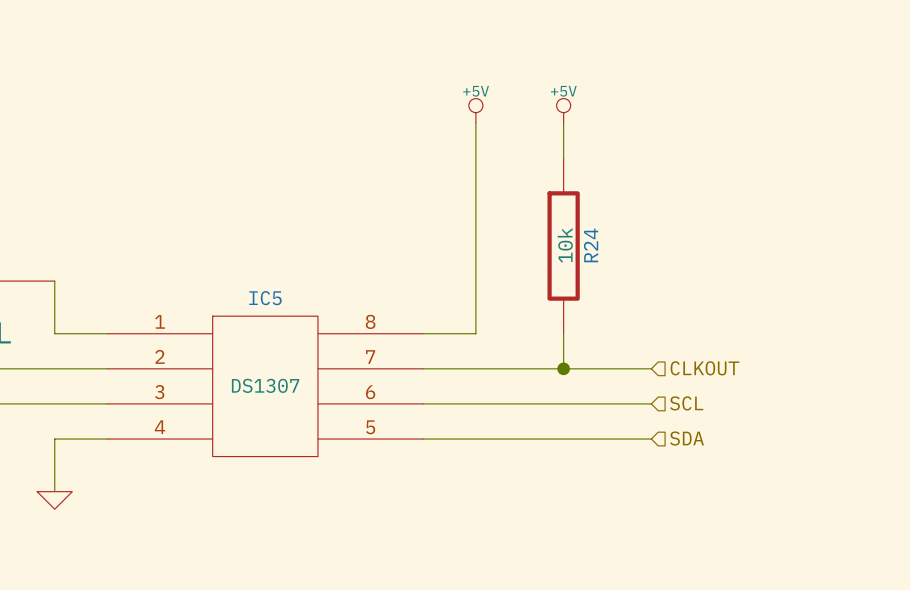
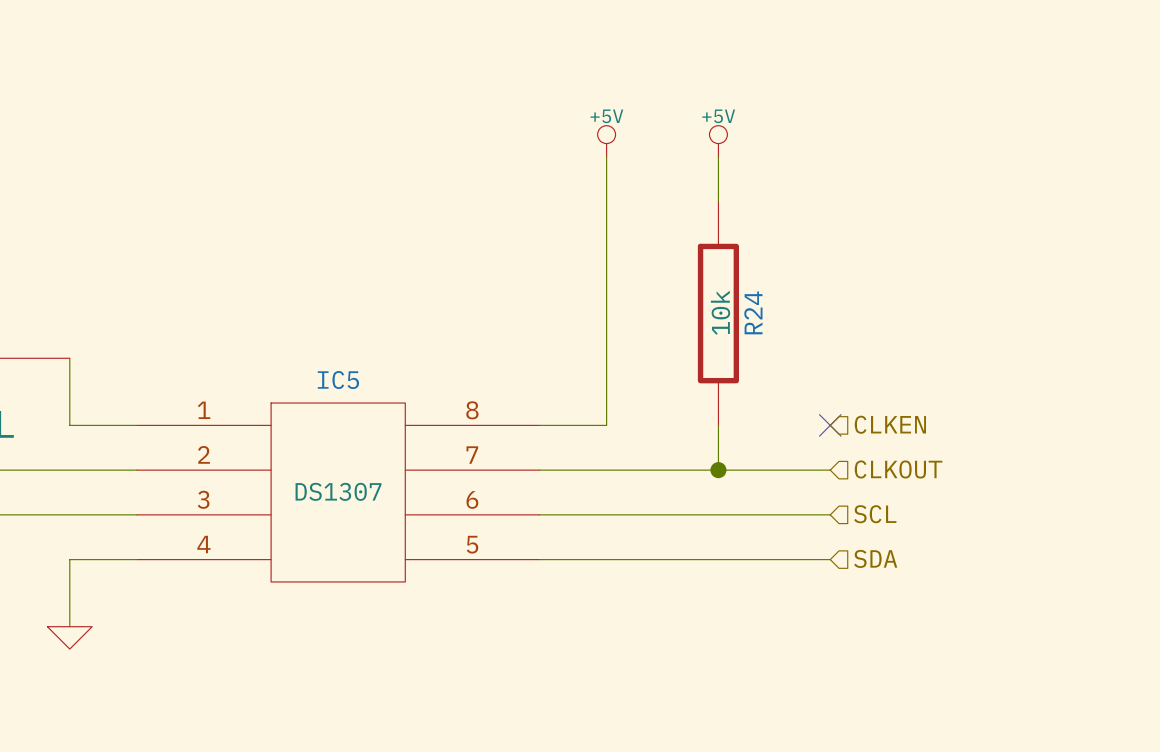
no-connect mark: none -> (830, 425)
hierarchical label: none -> CLKEN (890, 424)

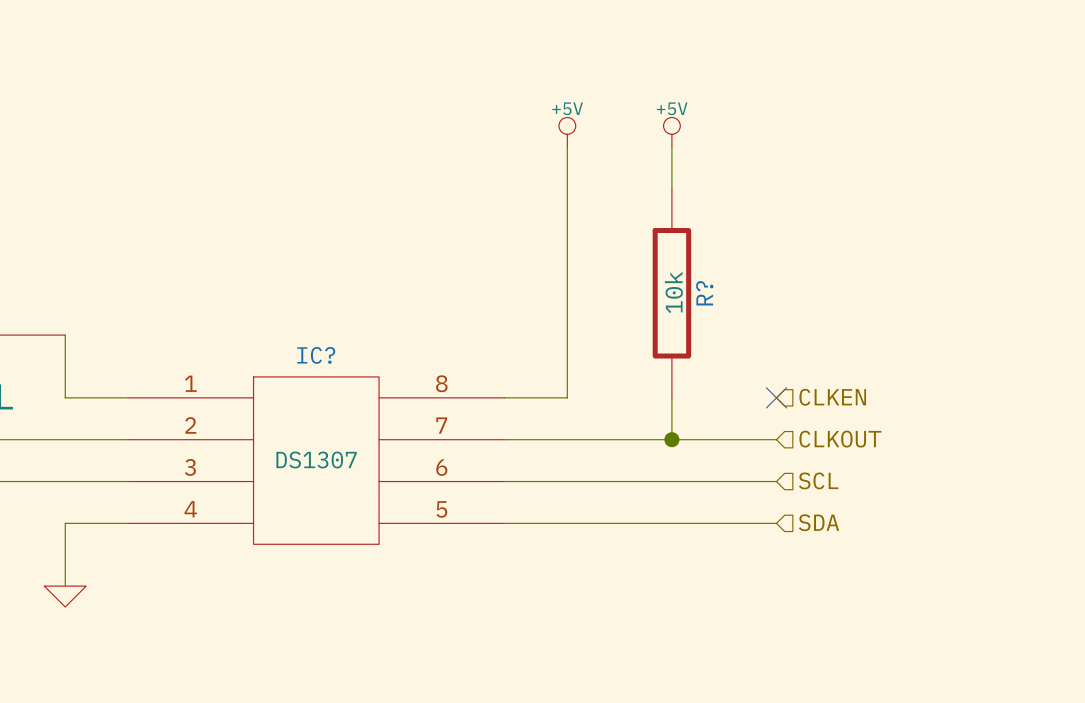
R24 name: R24 (753, 312) -> R? (704, 293)
IC5 name: IC5 (338, 380) -> IC? (316, 355)

